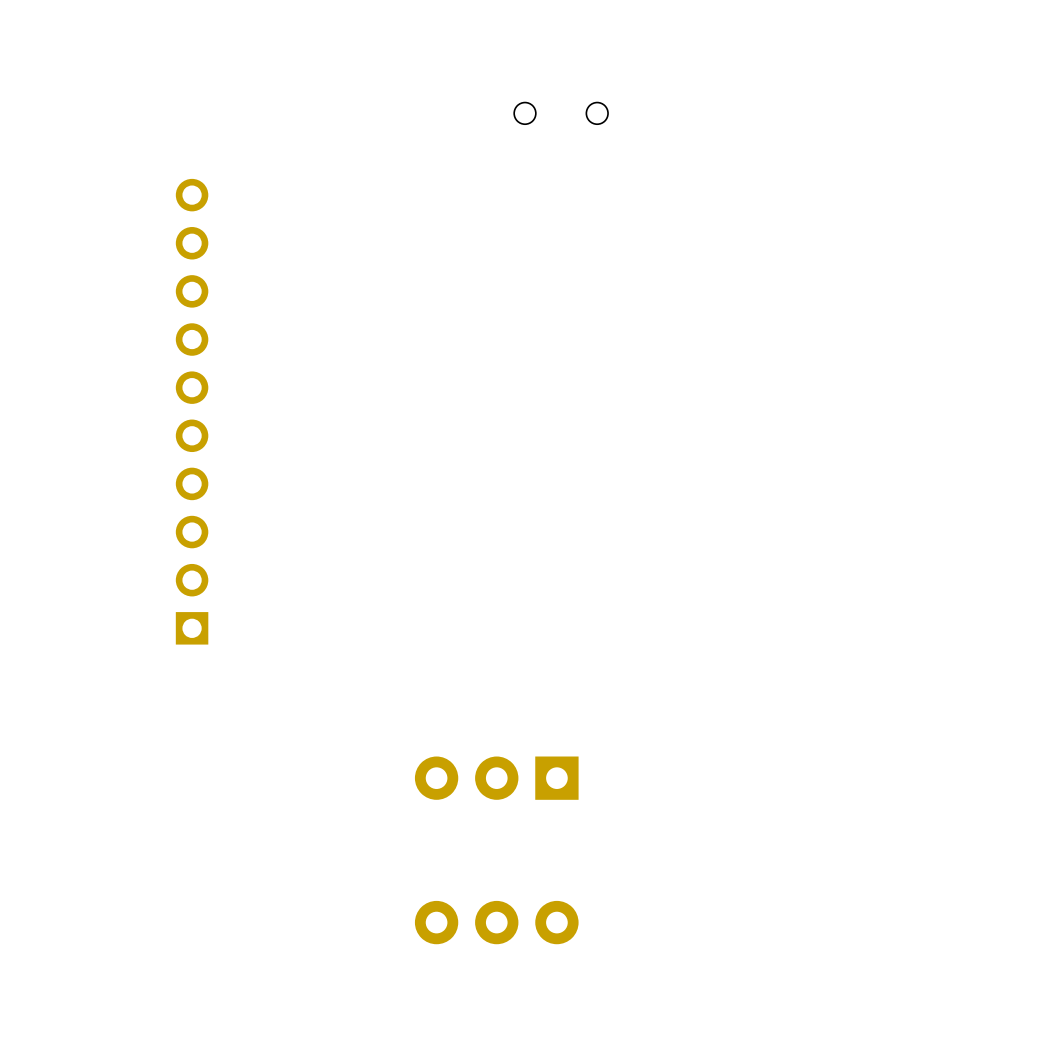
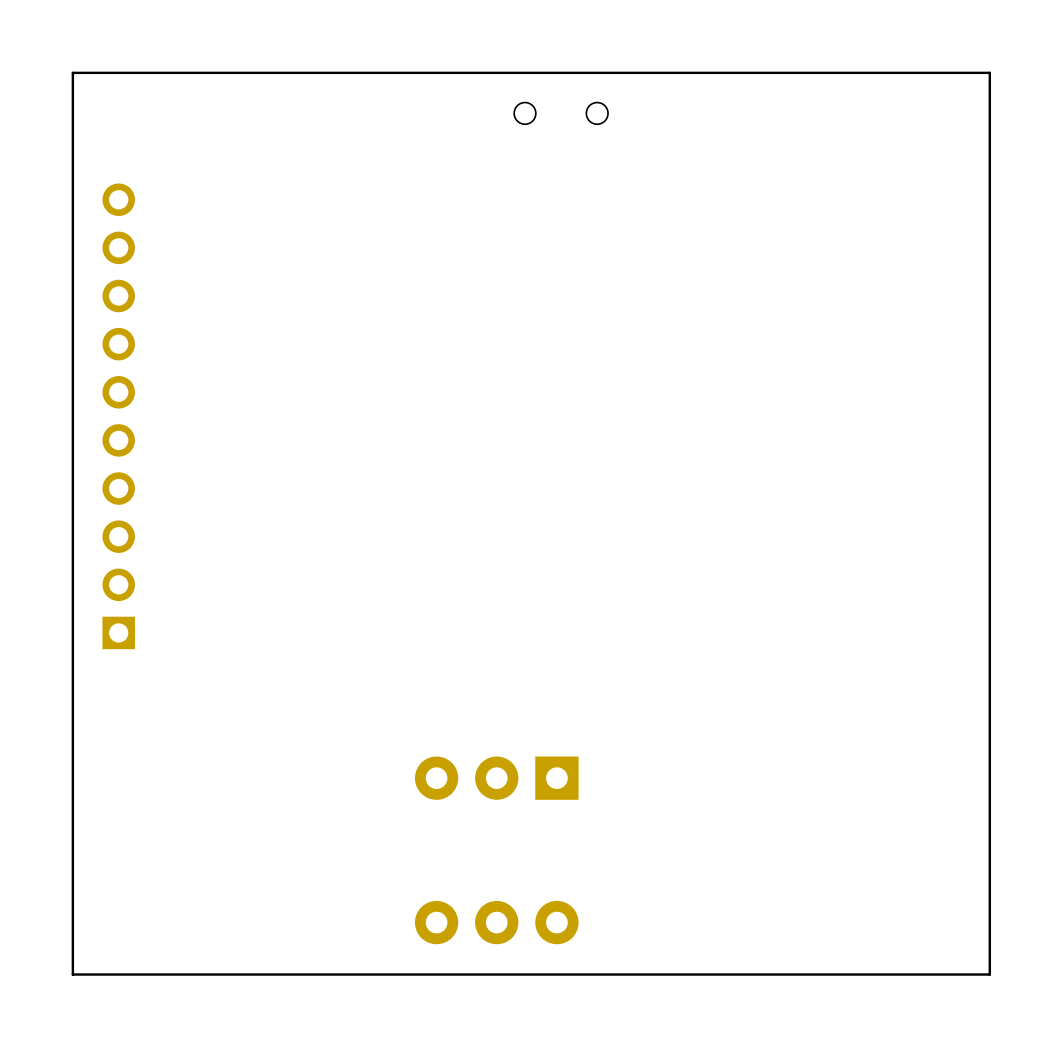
board edge: none -> (989, 72) (72, 72) (72, 974) (989, 974) (989, 72)
part position: (192, 411) -> (118, 416)

